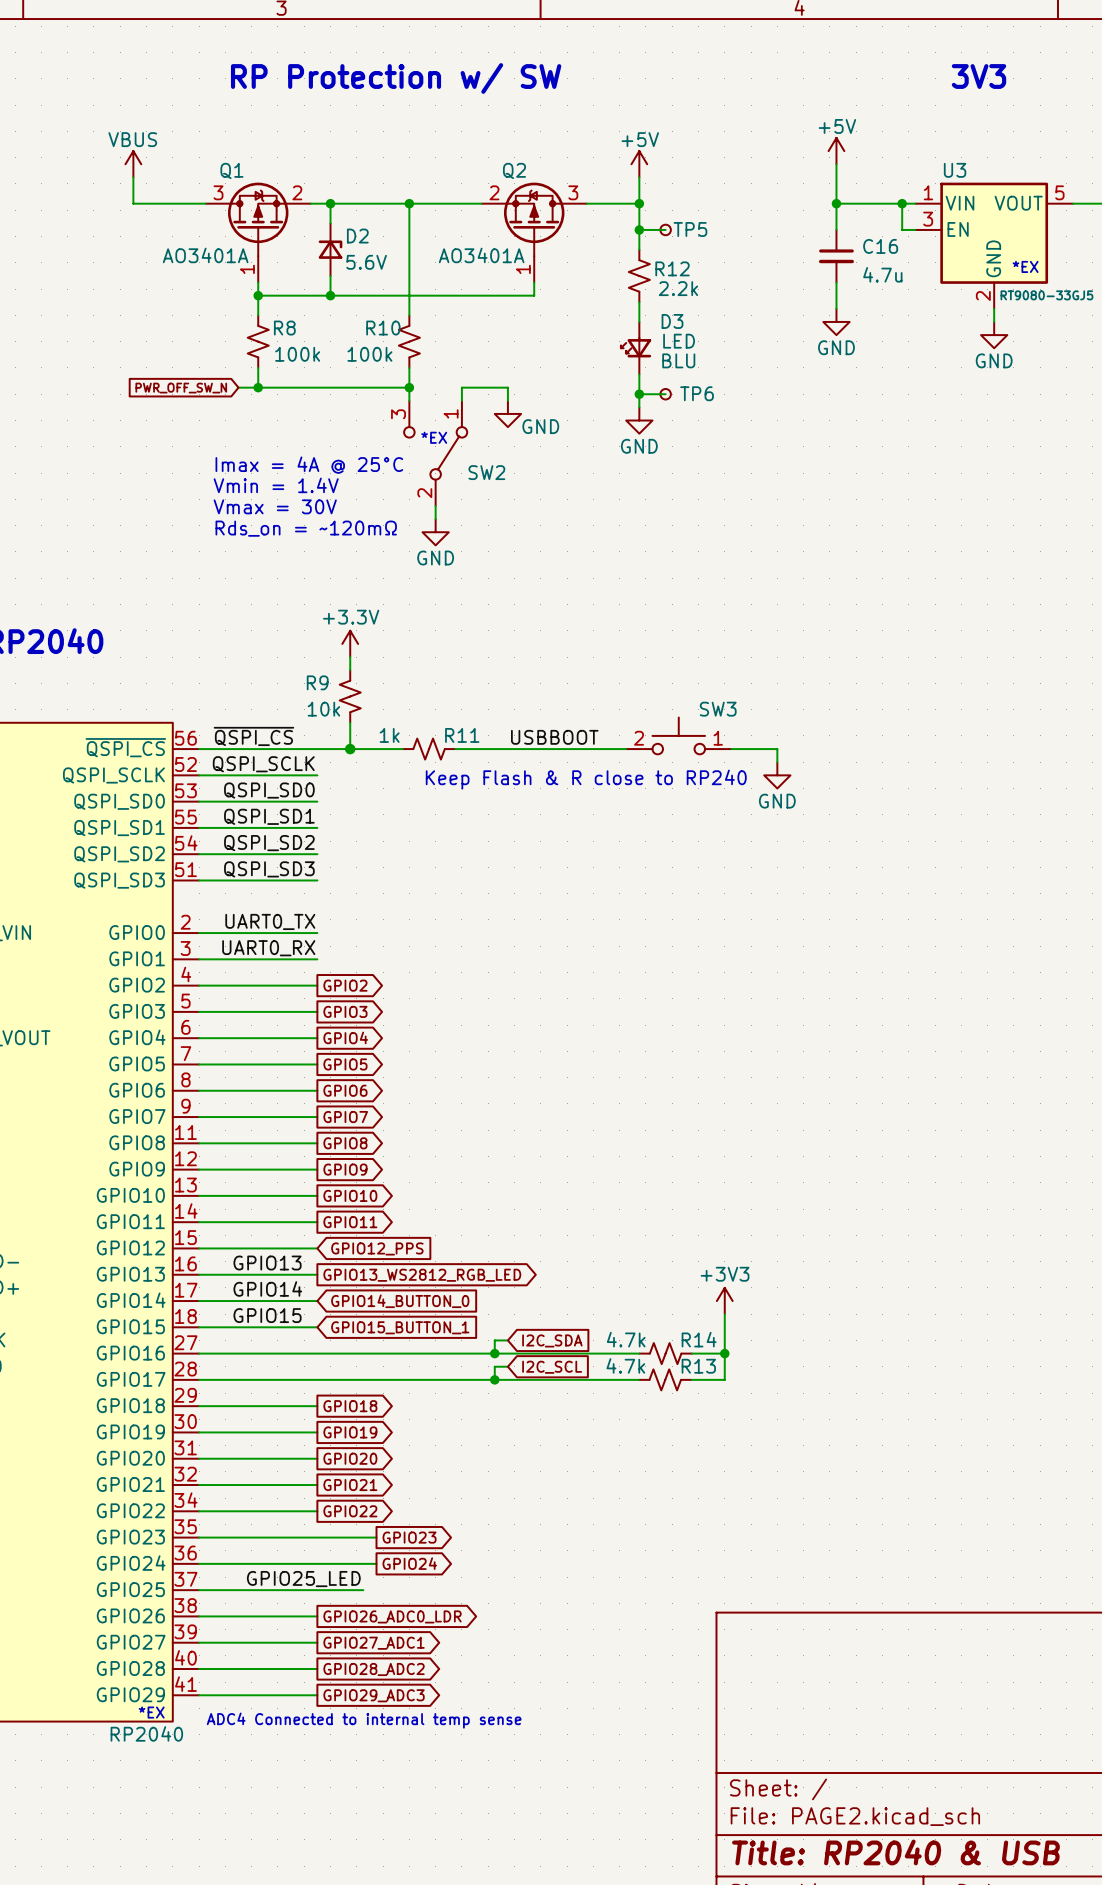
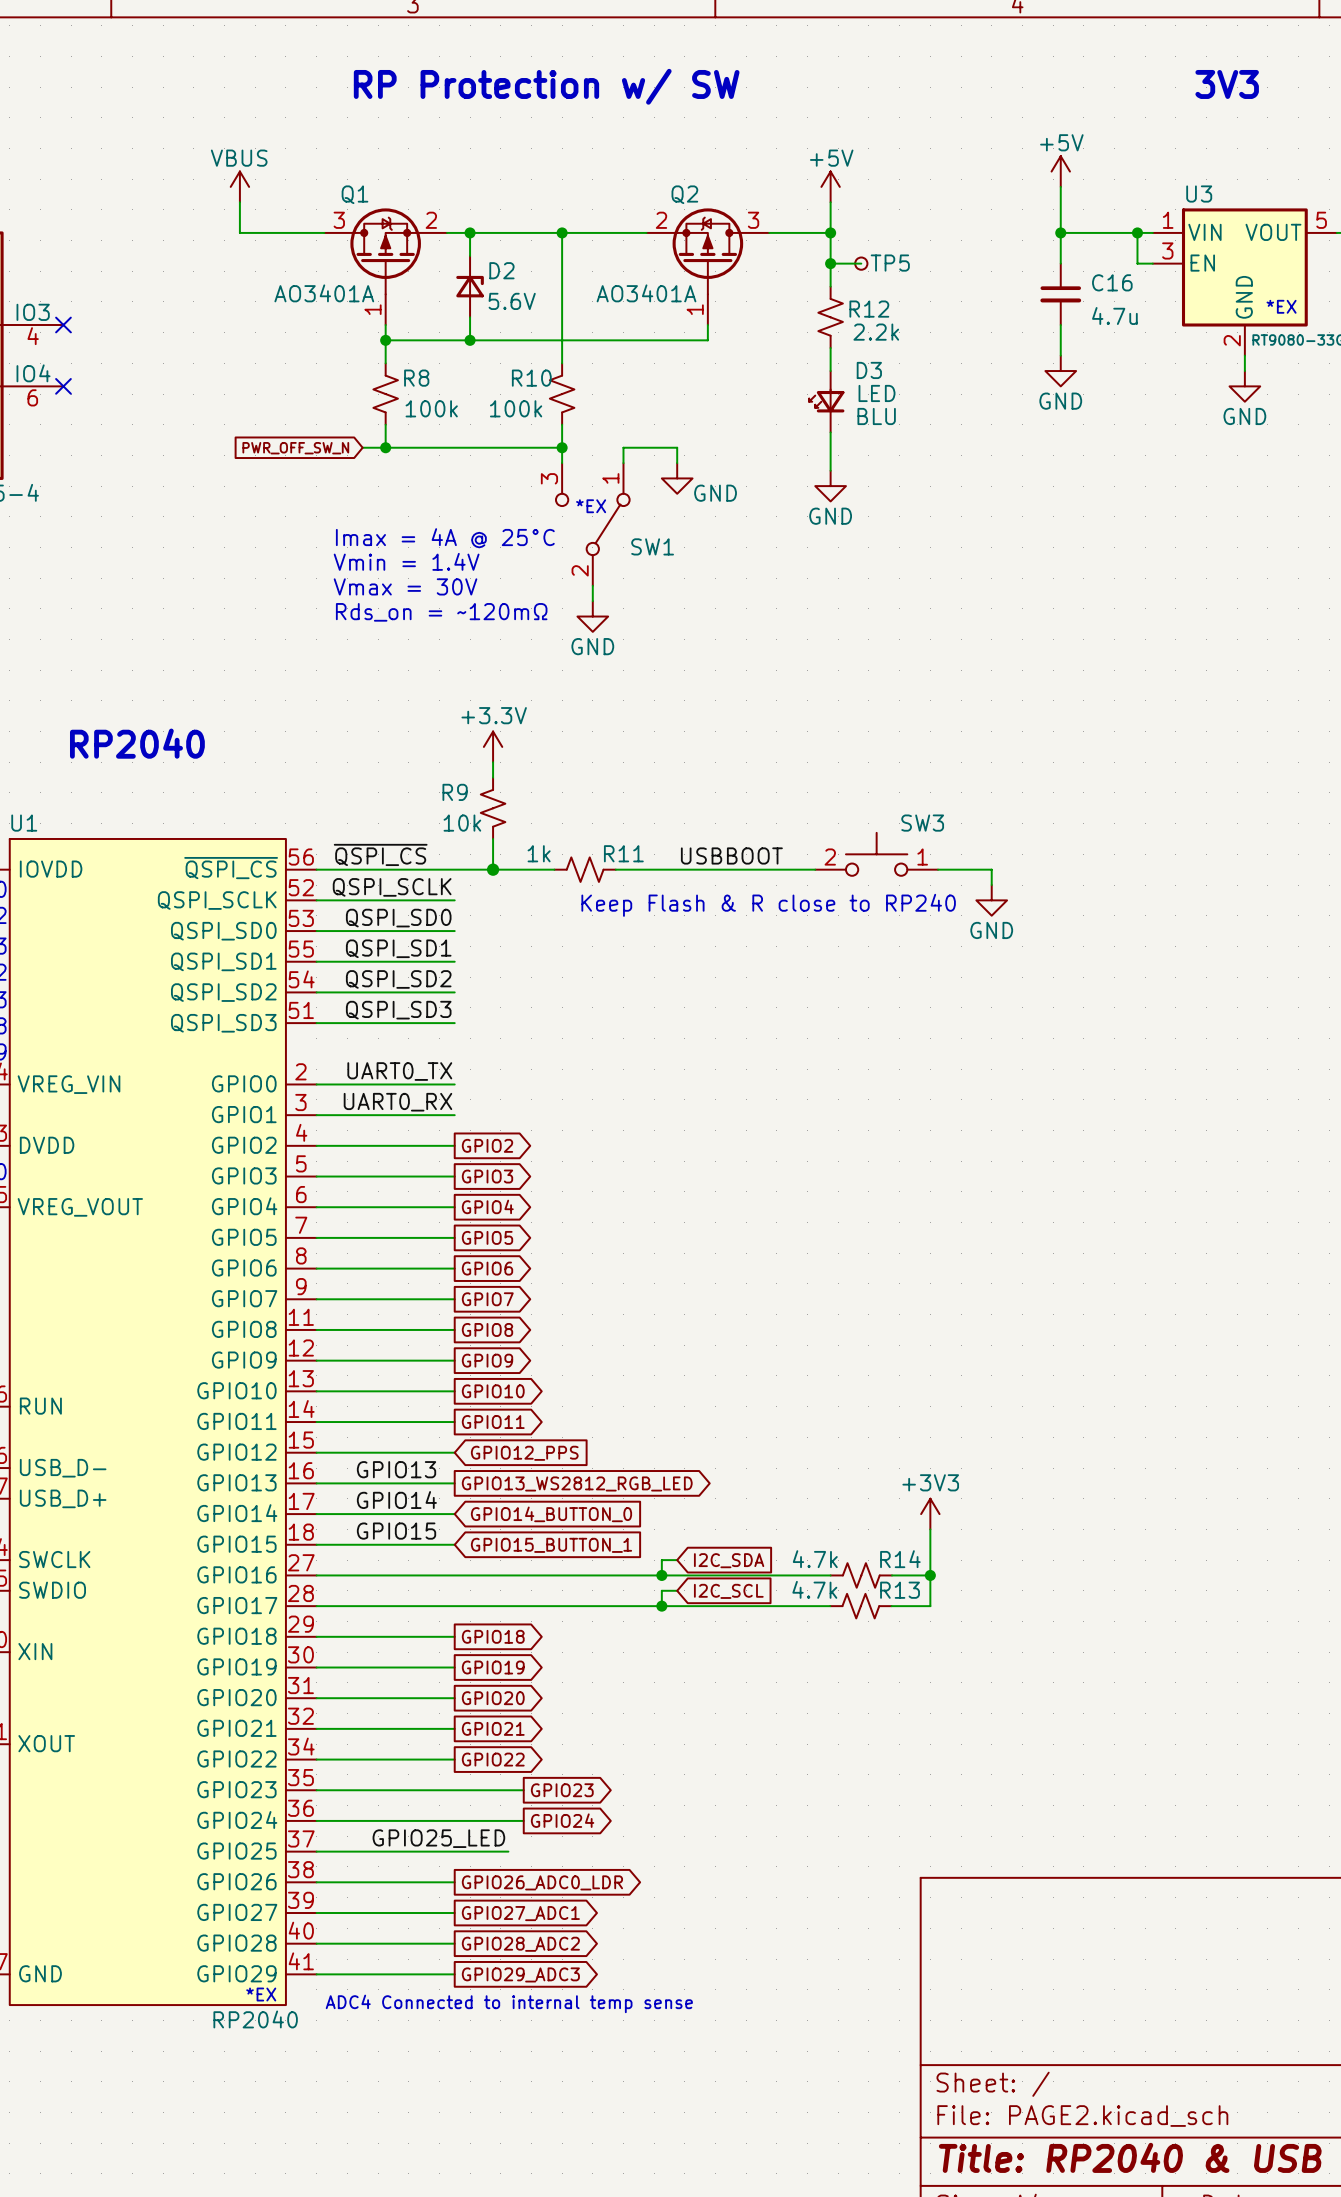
wire: (639, 394) (665, 394) -> none
junction: (639, 394) -> none
TP6: (665, 394) -> none
SW2 name: SW2 (486, 472) -> SW1 (652, 546)

